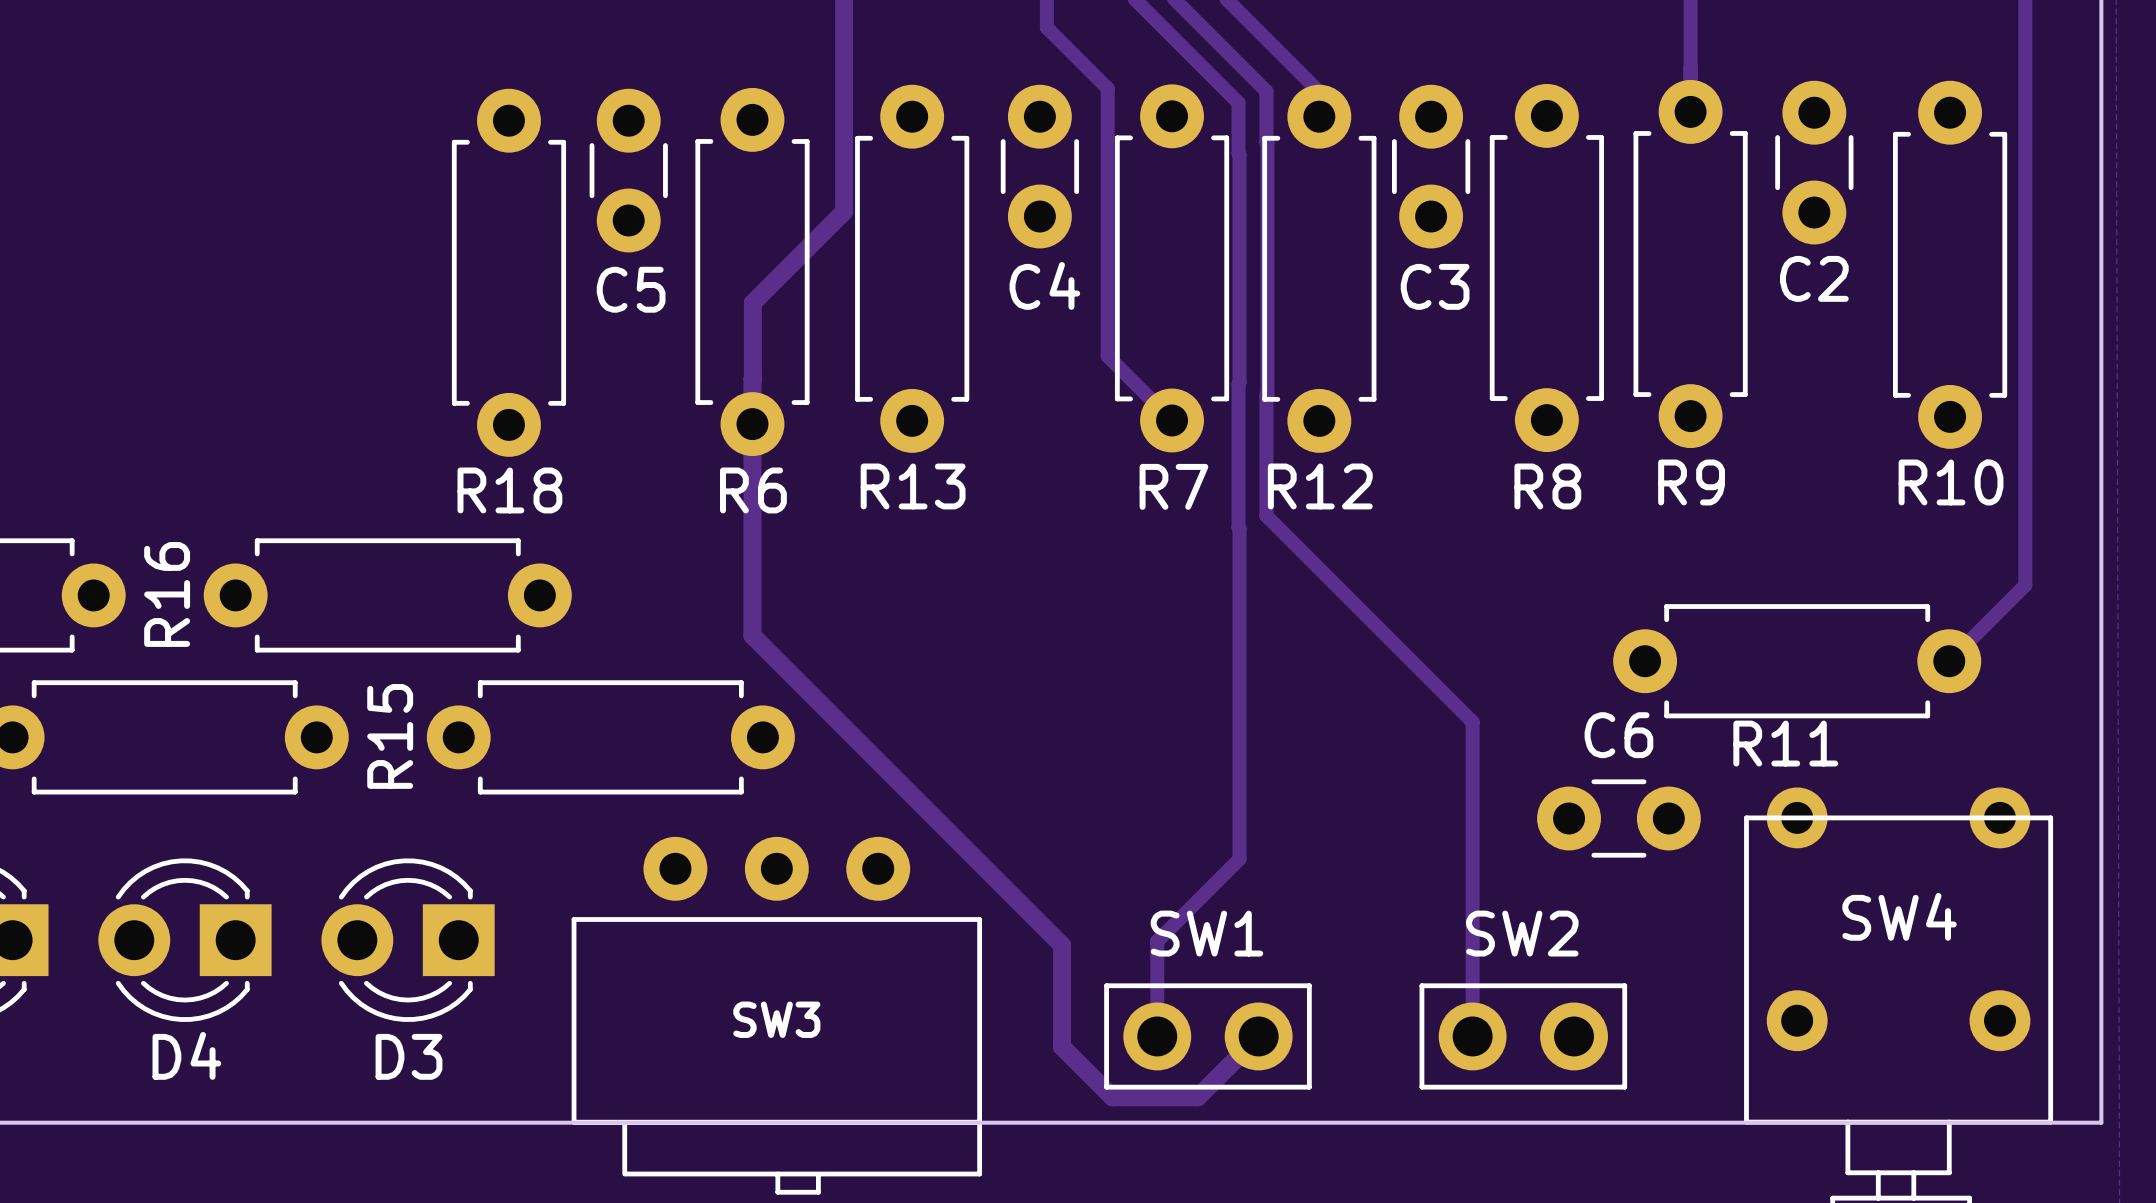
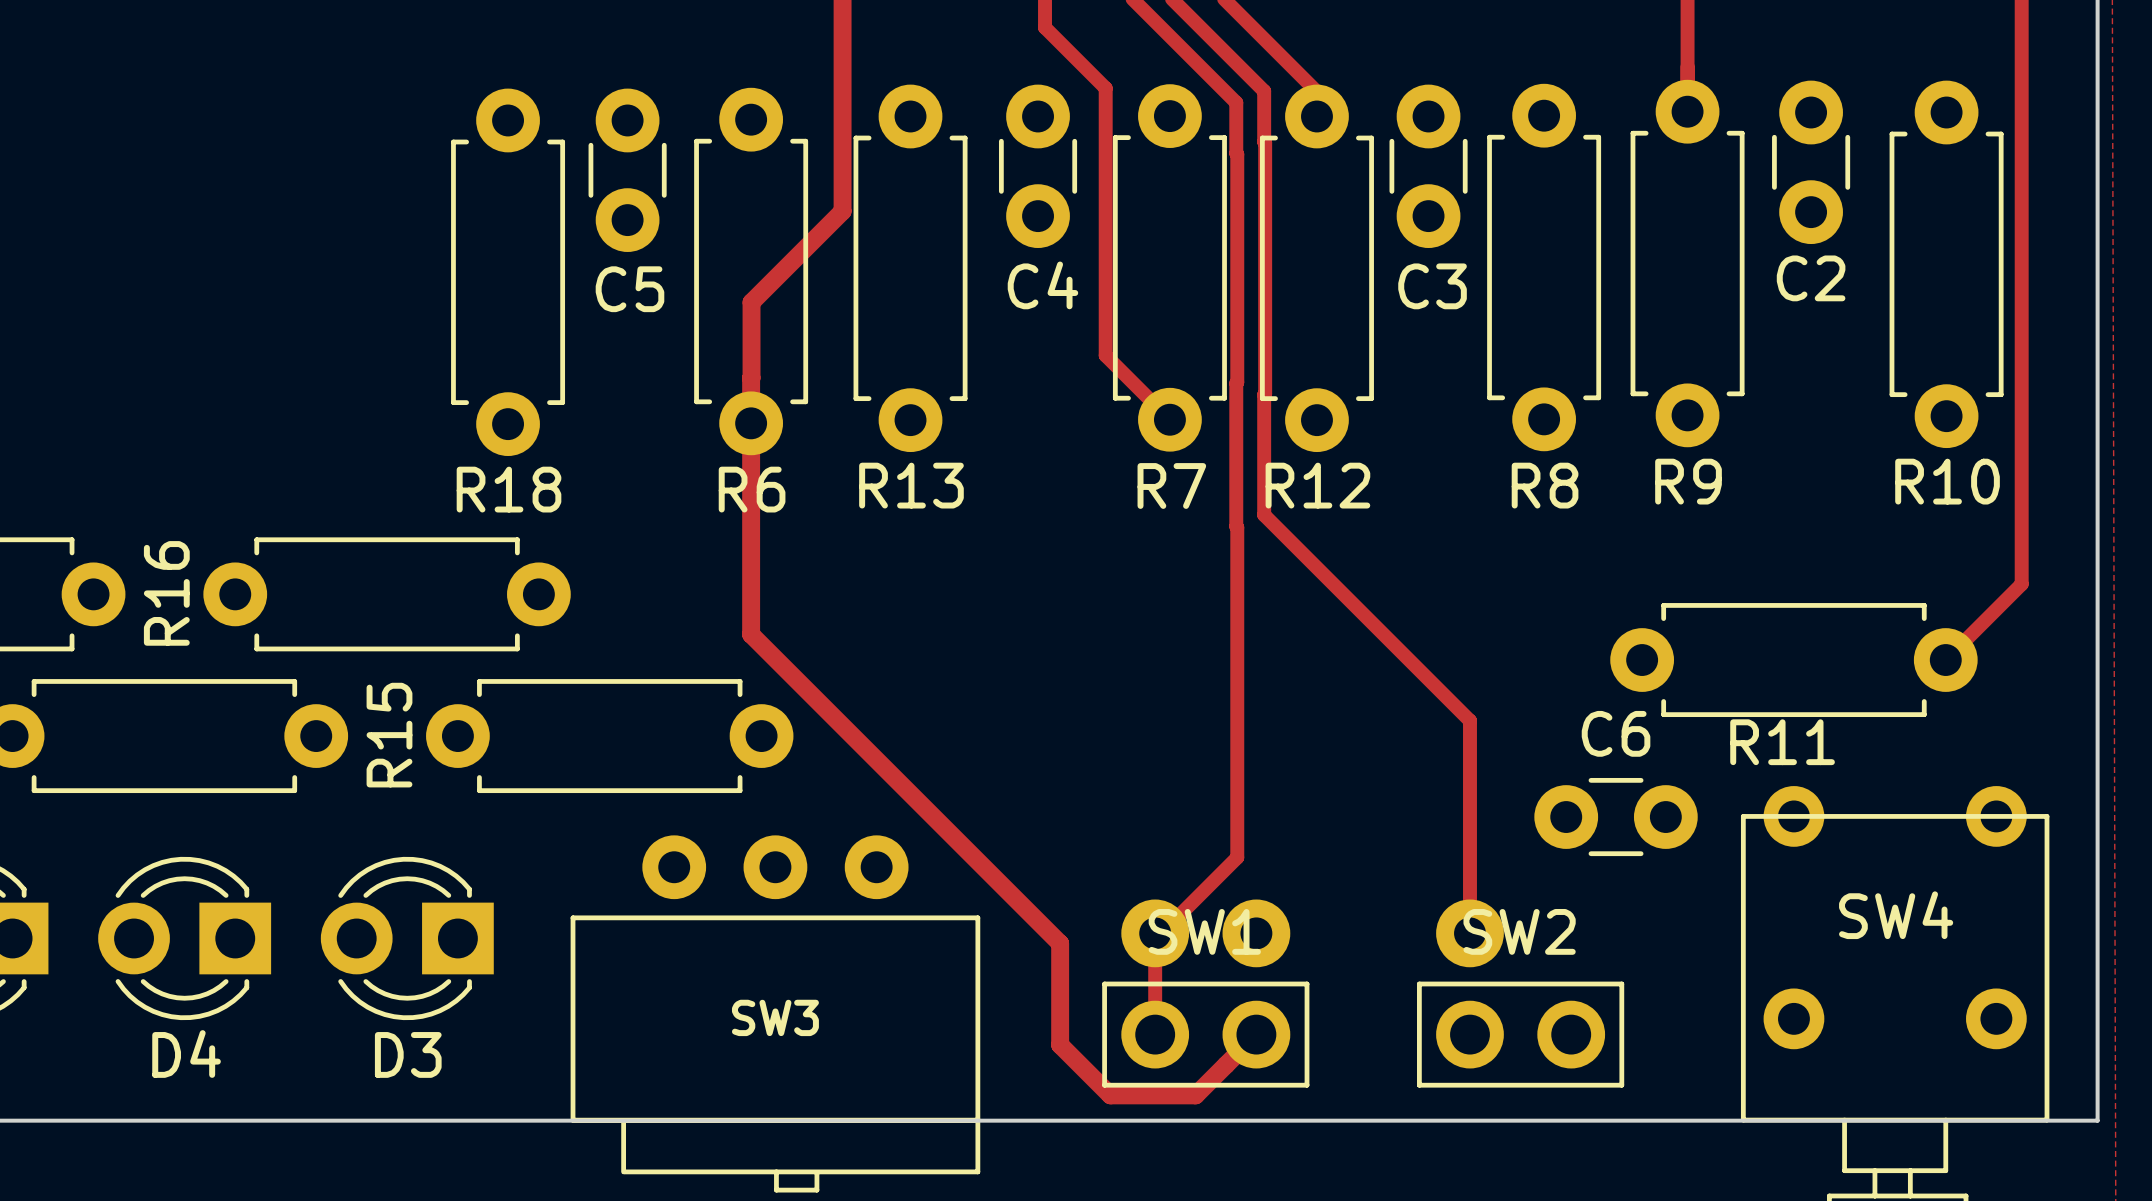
track: (1472, 948) (1472, 1036) -> none
SW1 footprint: [1104, 983, 1312, 1090] -> [1102, 899, 1310, 1088]
SW2 footprint: [1419, 983, 1628, 1090] -> [1416, 899, 1625, 1088]

